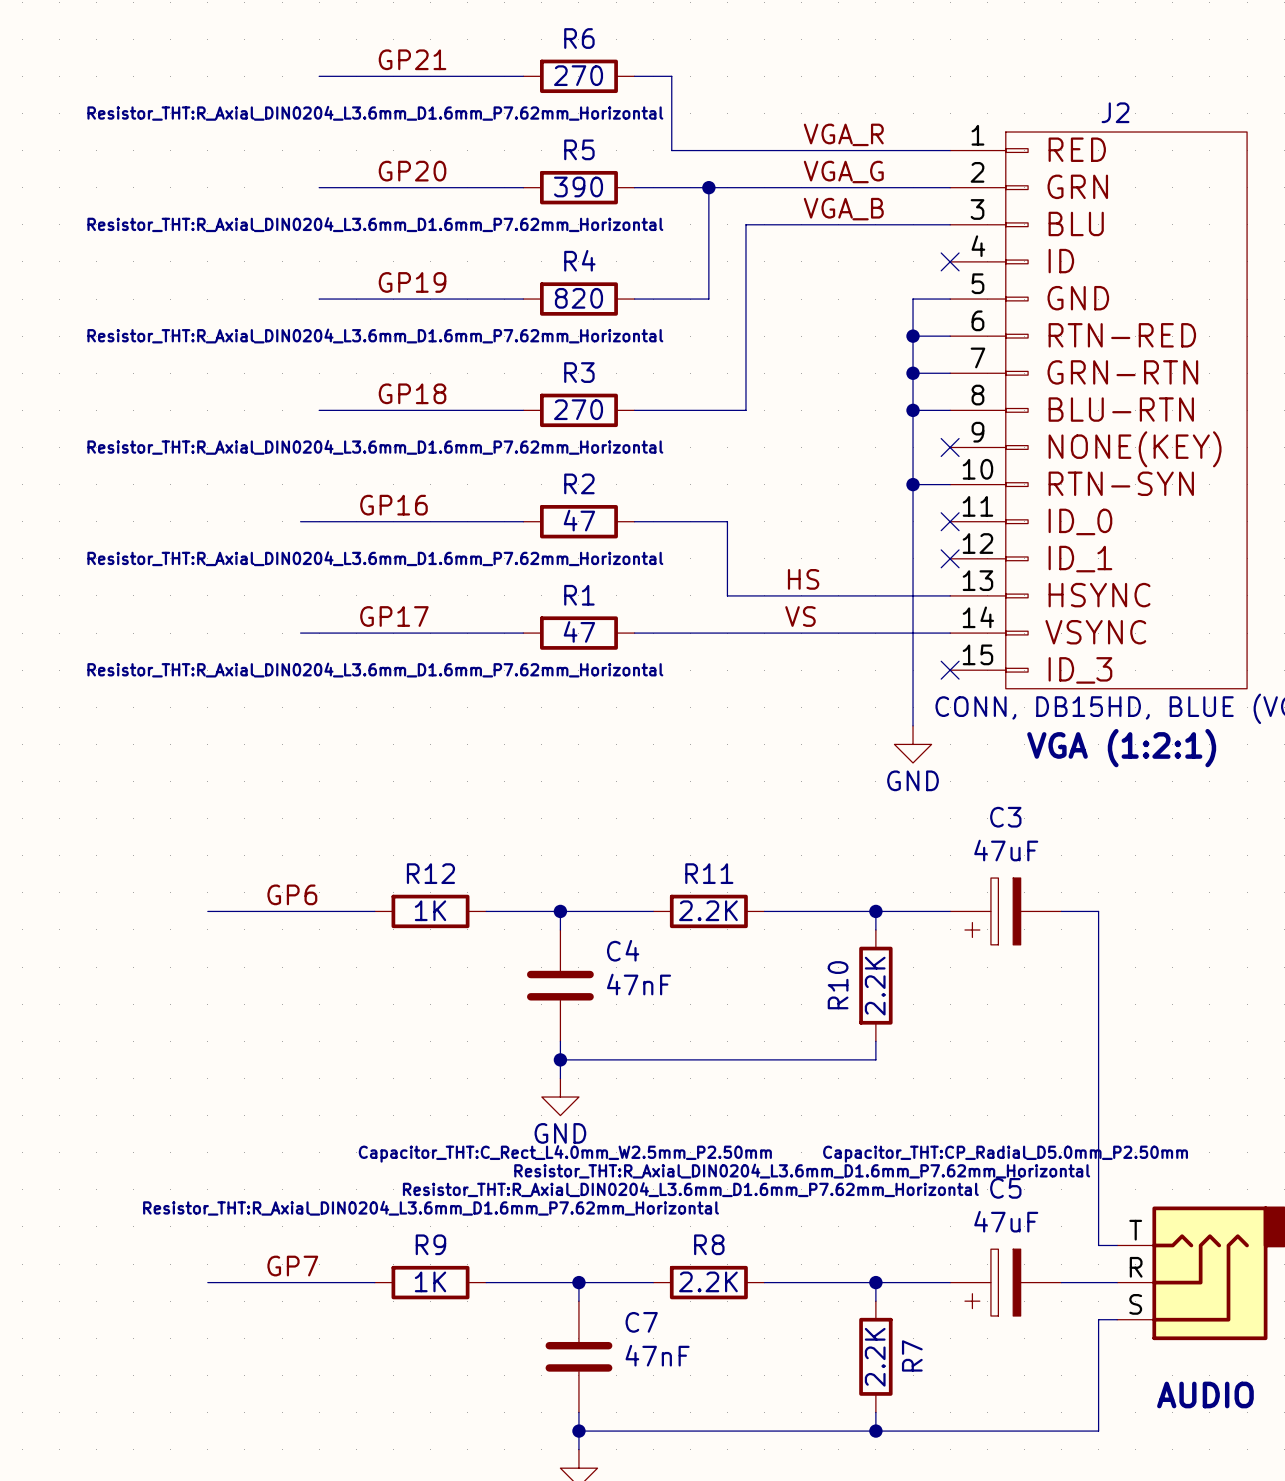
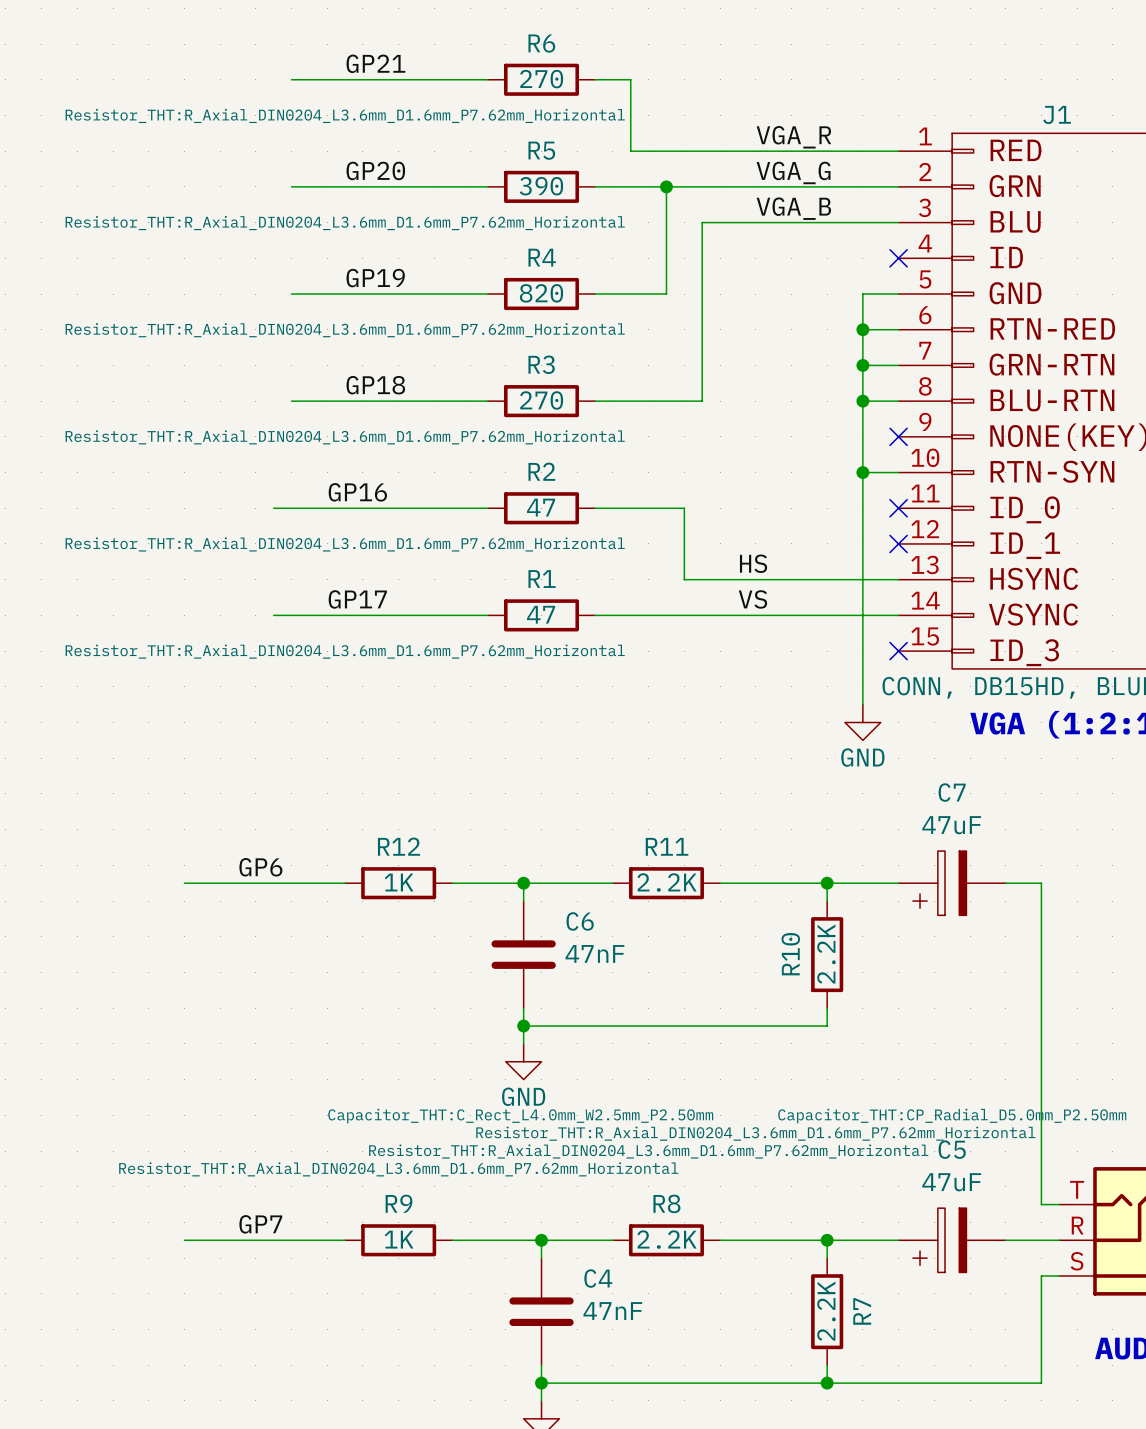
J2 name: J2 (1115, 112) -> J1 (1057, 114)
C3 name: C3 (1005, 817) -> C7 (952, 792)
C4 name: C4 (623, 950) -> C6 (580, 921)
C7 name: C7 (641, 1322) -> C4 (598, 1278)

